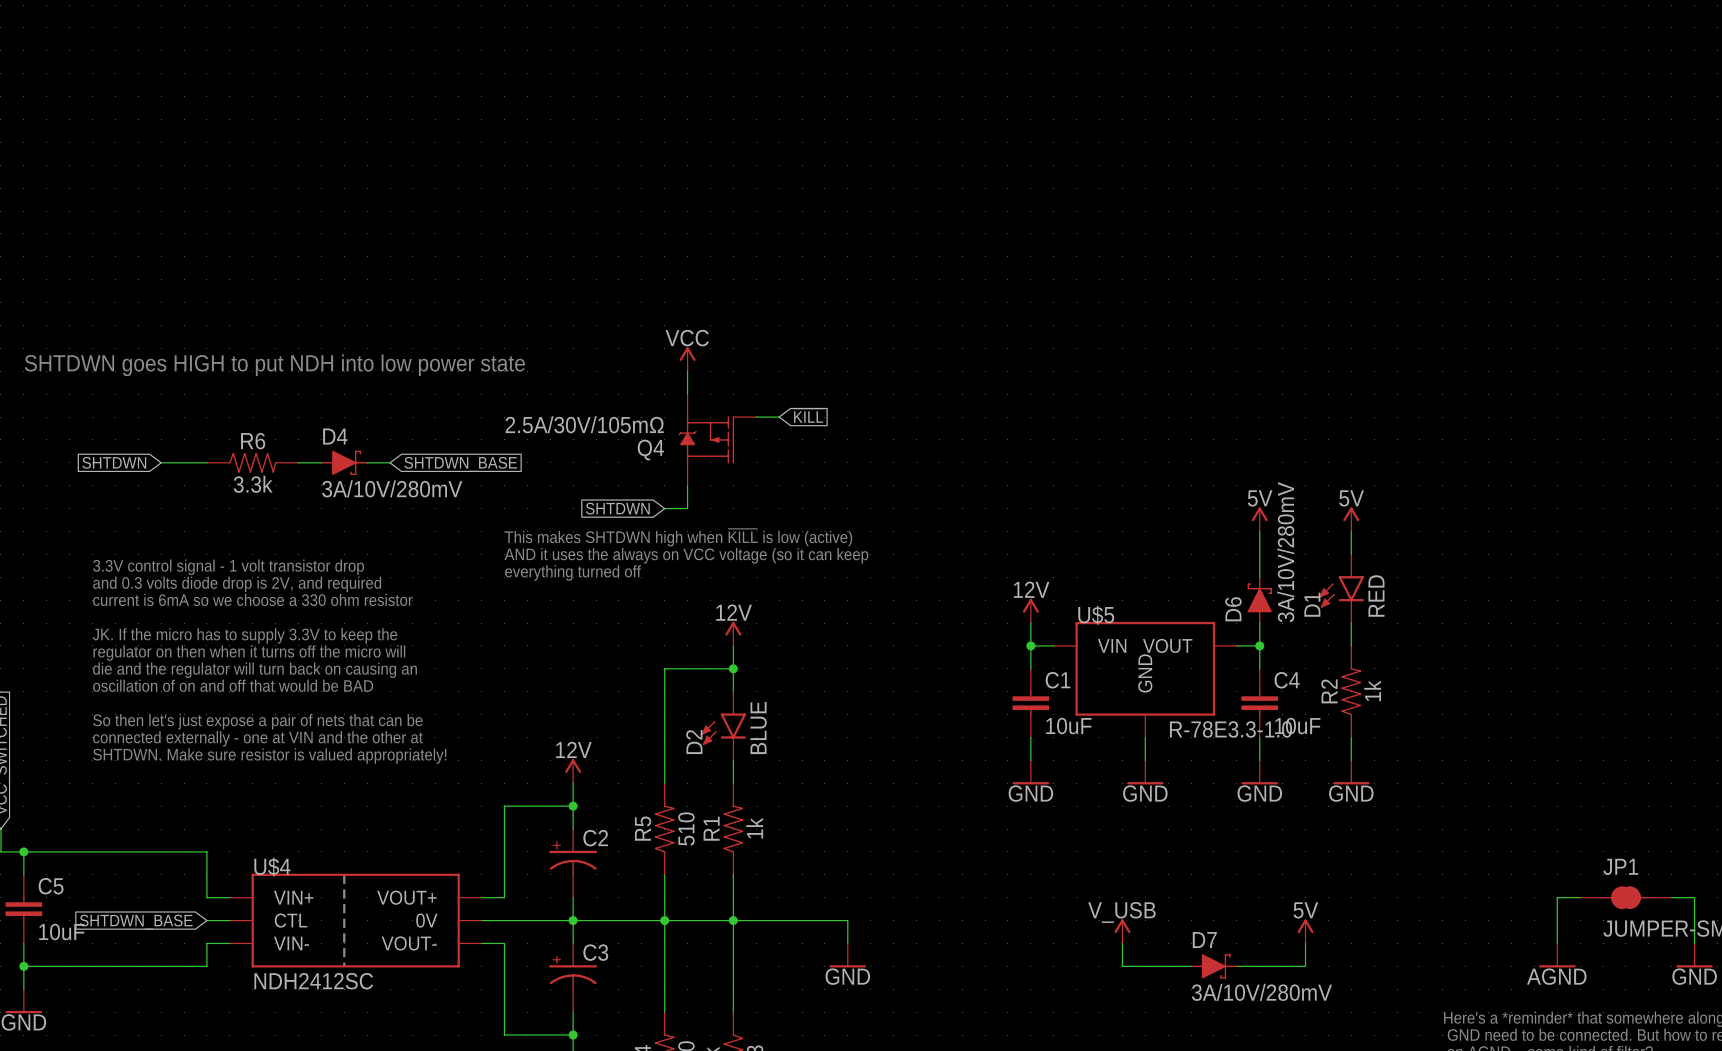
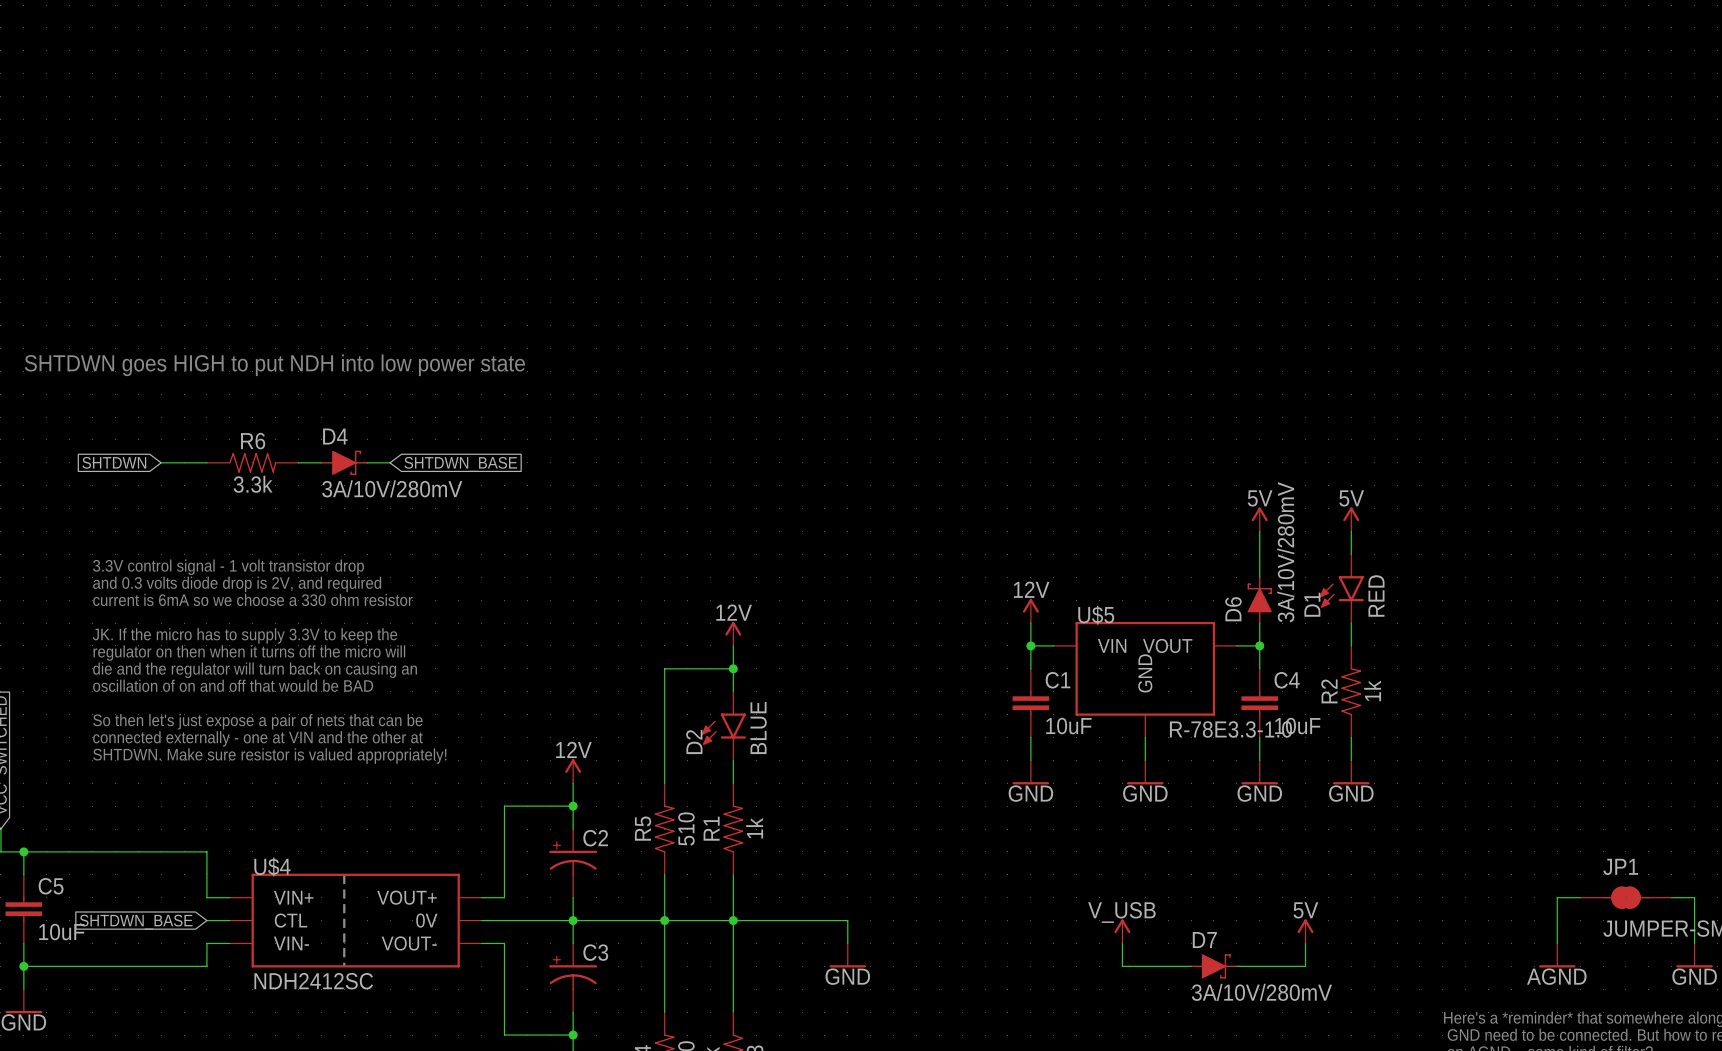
power symbol: VCC (687, 359) -> none
wire: (687, 371) (687, 394) -> none
global label: ~{KILL} (808, 415) -> none
wire: (756, 417) (779, 417) -> none
Q4: 2.5A/30V/105mΩ (717, 439) -> none
wire: (687, 485) (687, 508) (664, 508) -> none
global label: SHTDWN (617, 508) -> none
text: This makes SHTDWN high when ~{KILL} is low (active) (678, 537) -> none
text: AND it uses the always on VCC voltage (so it can keep (686, 555) -> none
text: everything turned off (573, 572) -> none

